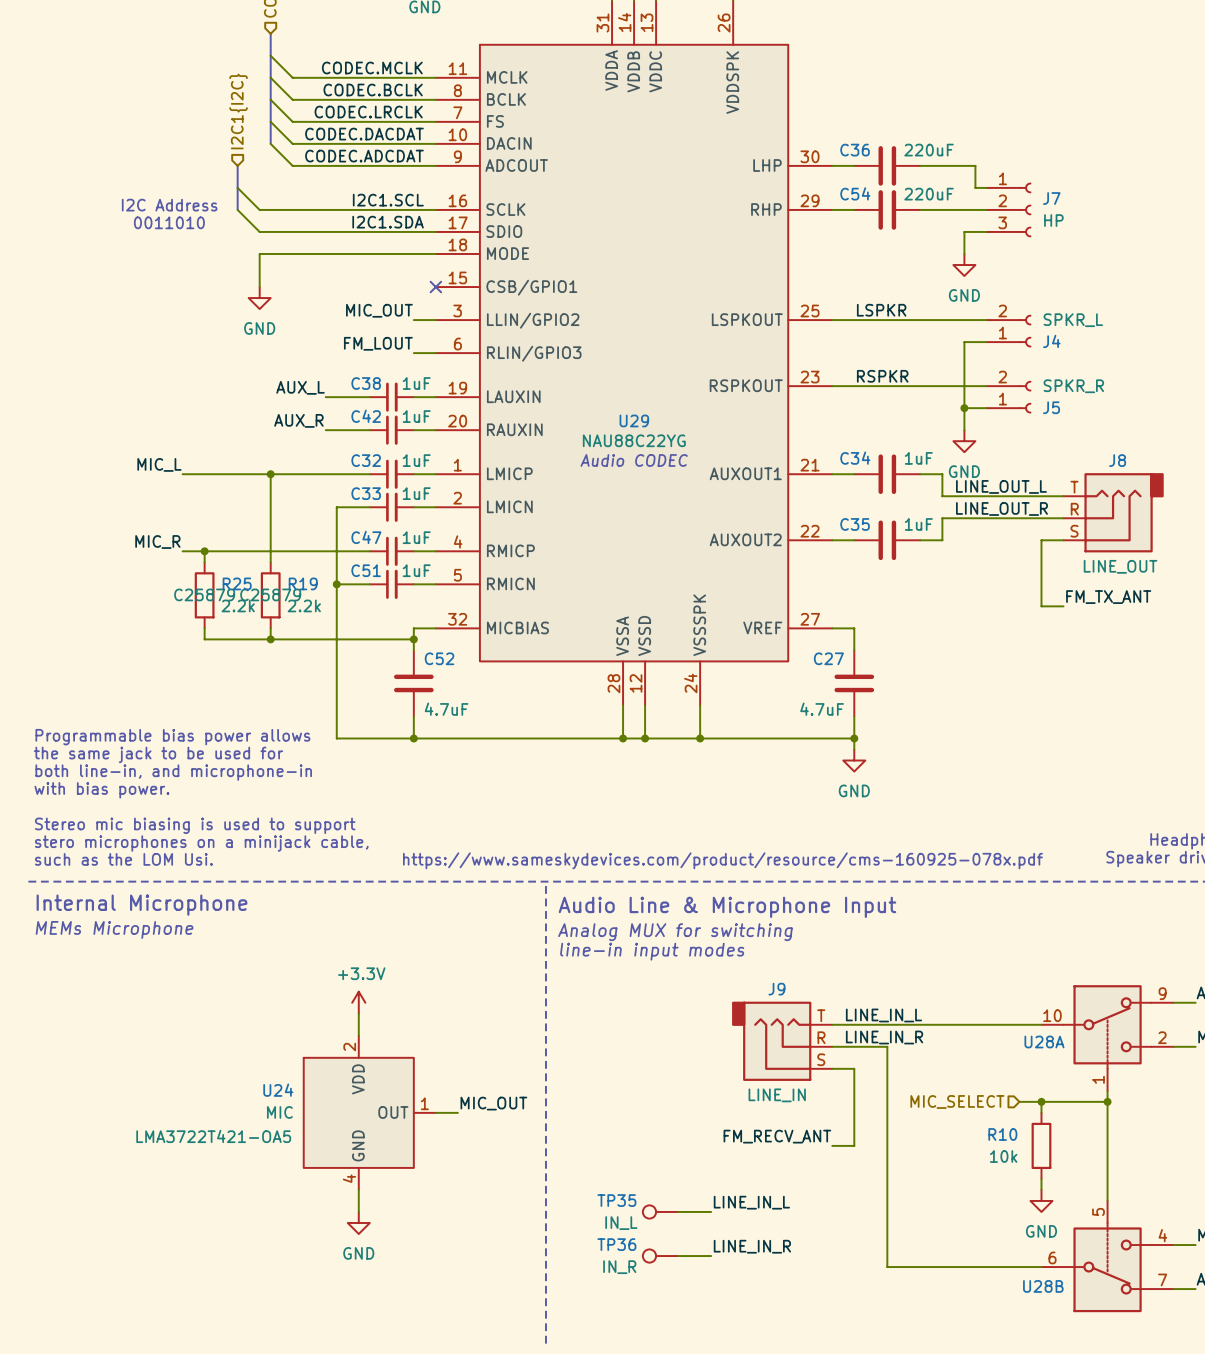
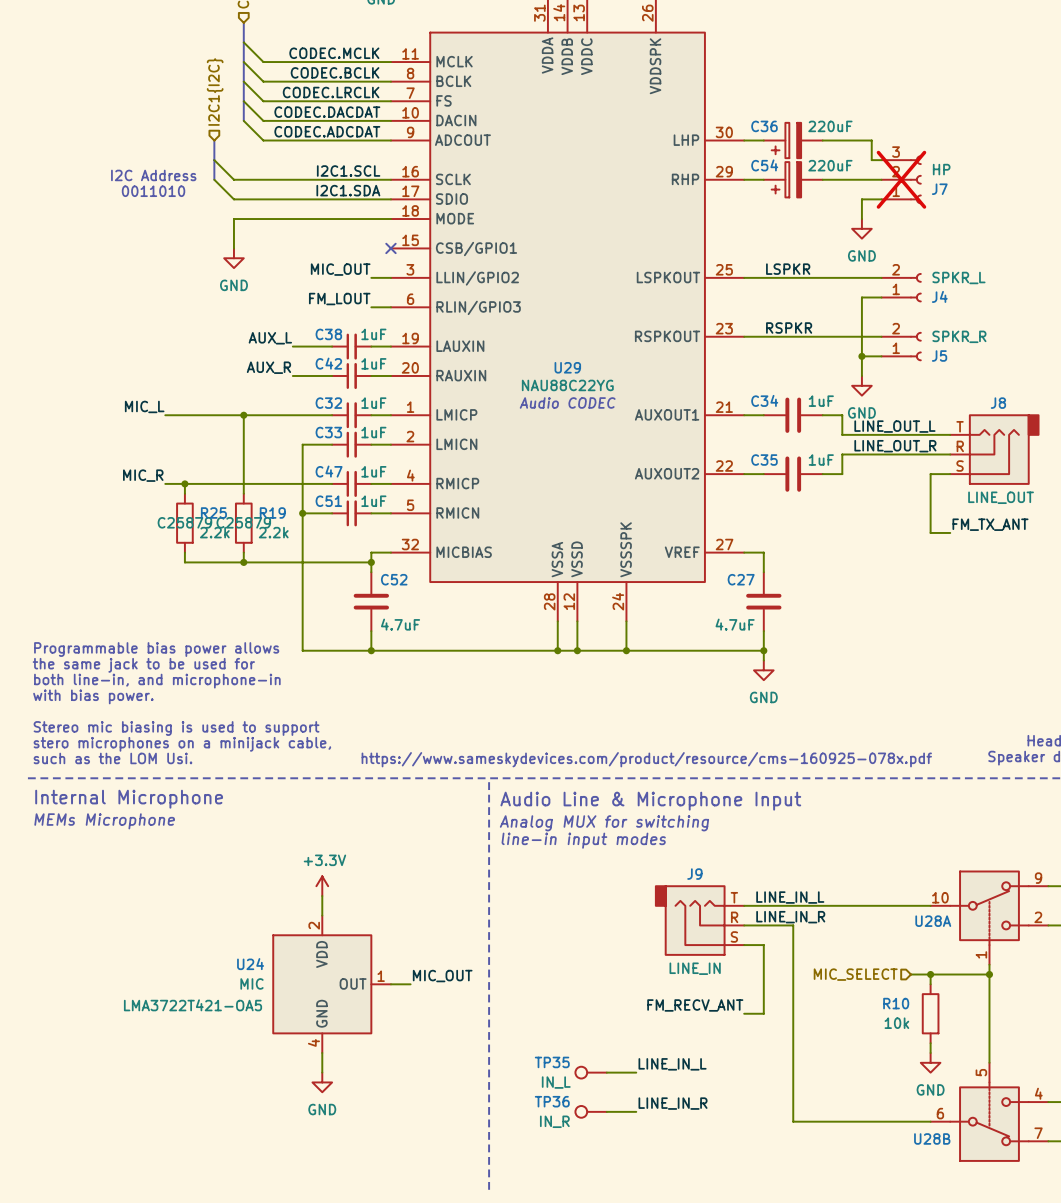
C36 symbol: [854, 146, 921, 186] -> [763, 122, 823, 159]
C54 symbol: [854, 190, 921, 230] -> [763, 162, 823, 198]
J7 do-not-place cross: none -> (901, 179)
J7 flip: as is (1024, 209) -> up-down (915, 179)

